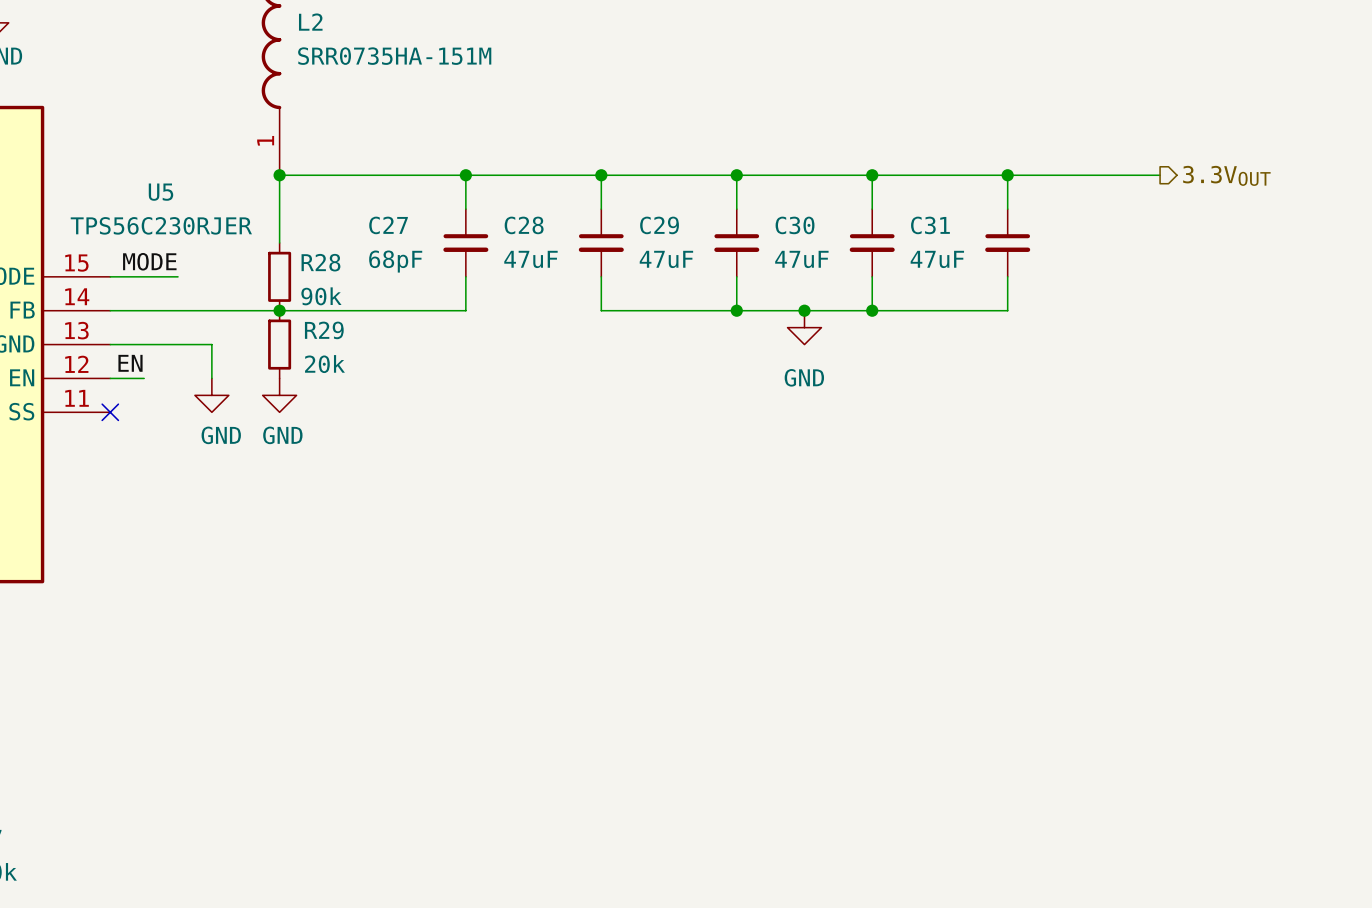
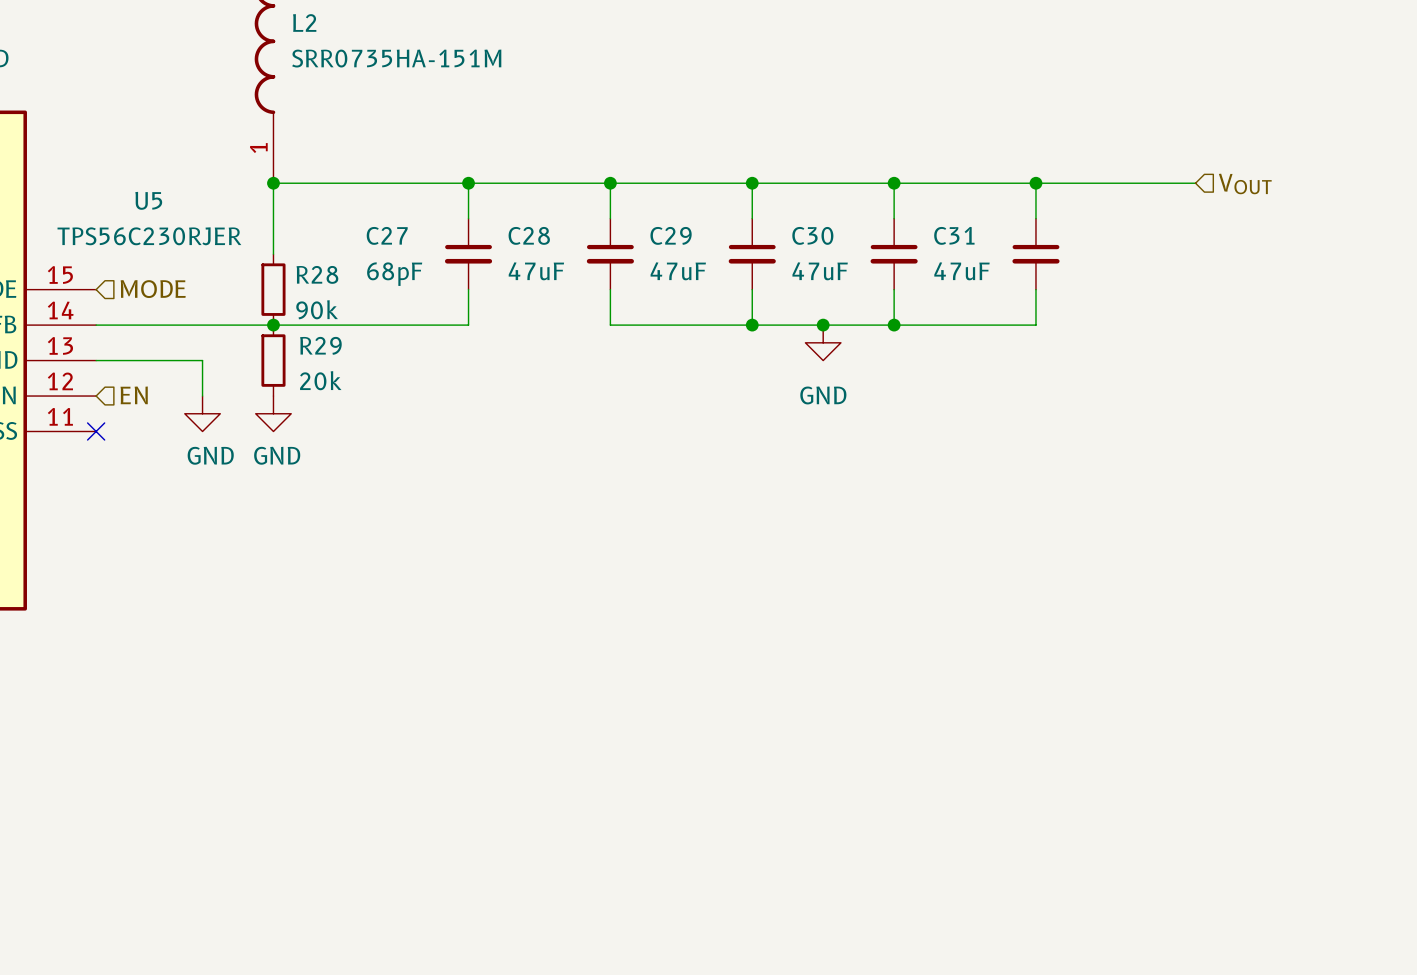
hierarchical label shape: output (1226, 175) -> input (1245, 183)
hierarchical label: 3.3VOUT (1226, 175) -> VOUT (1245, 183)
label: MODE (149, 261) -> none
wire: (110, 276) (178, 276) -> none
hierarchical label: none -> MODE (153, 289)
label: EN (130, 363) -> none
hierarchical label: none -> EN (134, 395)
wire: (110, 378) (144, 378) -> none

